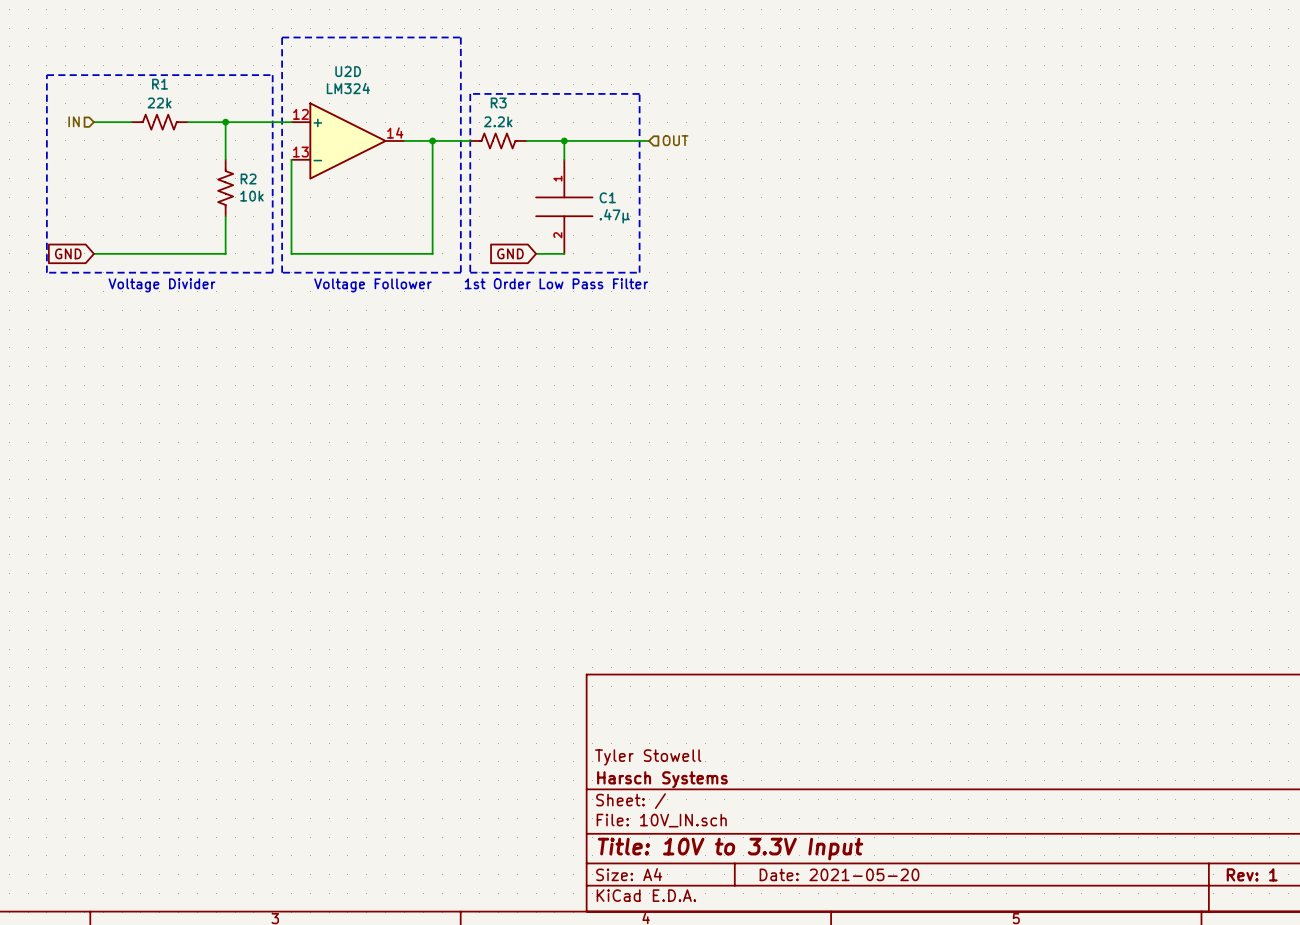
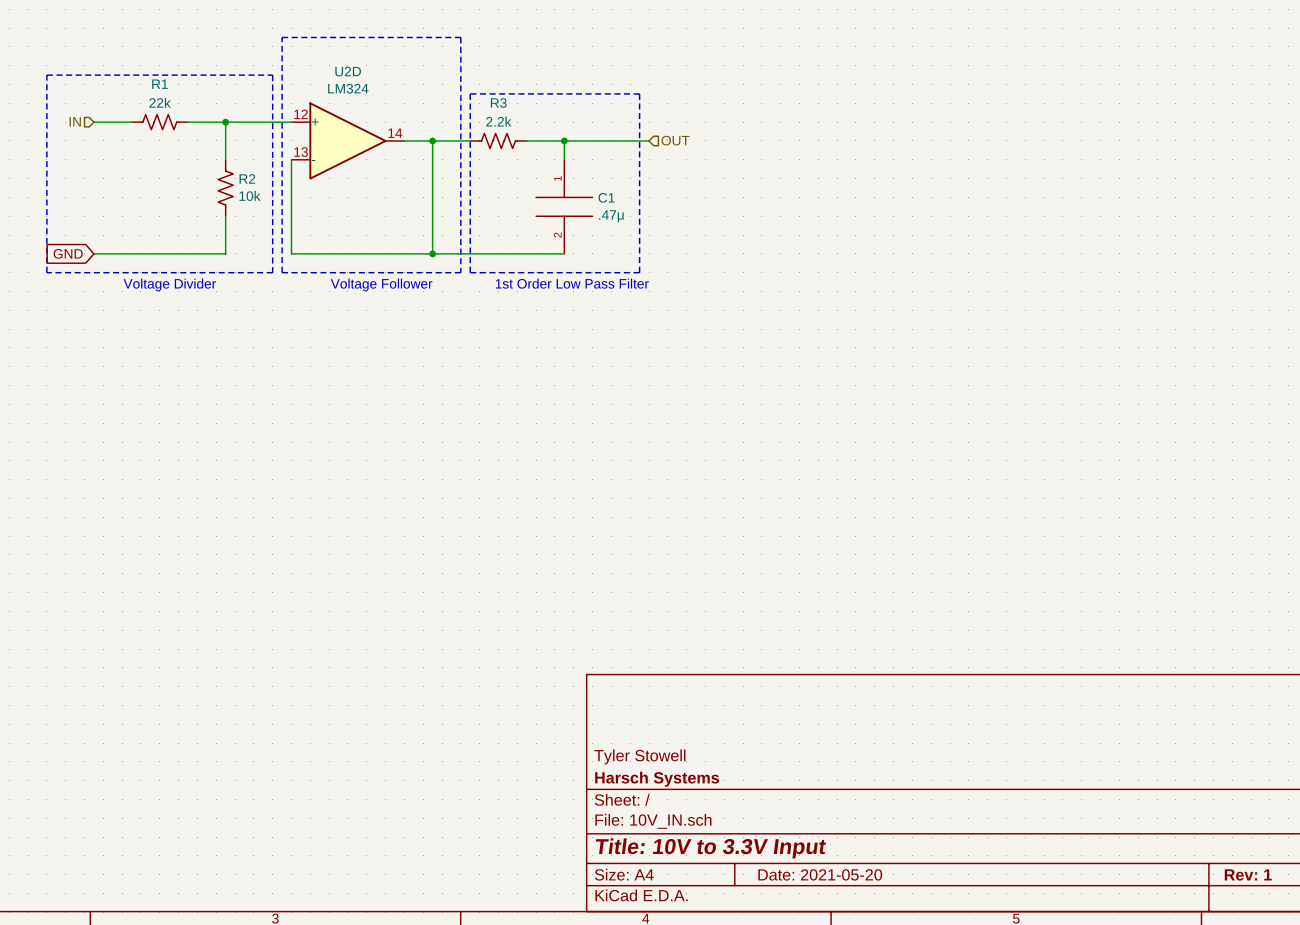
wire: none -> (432, 253) (536, 253)
junction: none -> (432, 253)
global label: GND (510, 253) -> none

